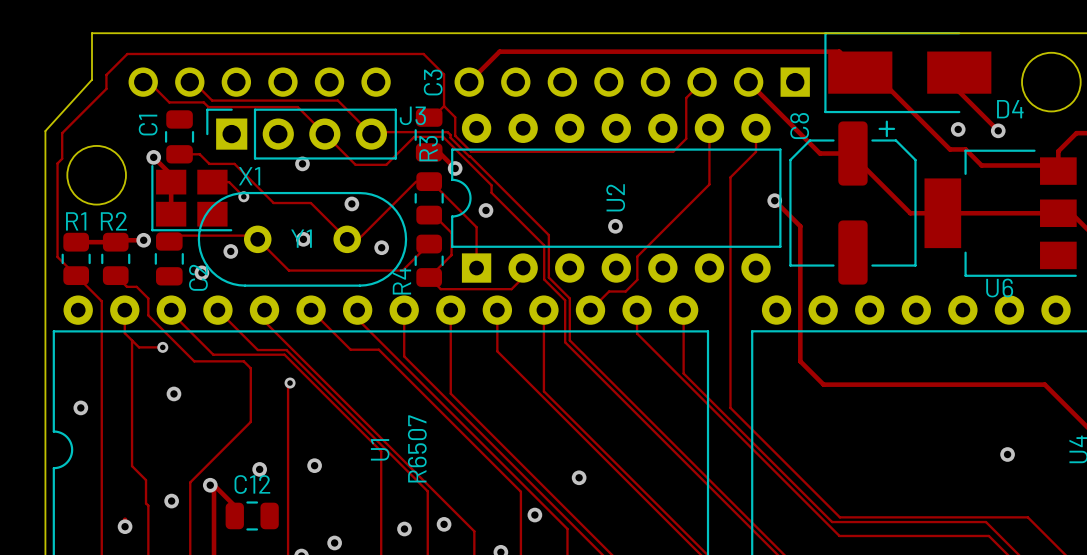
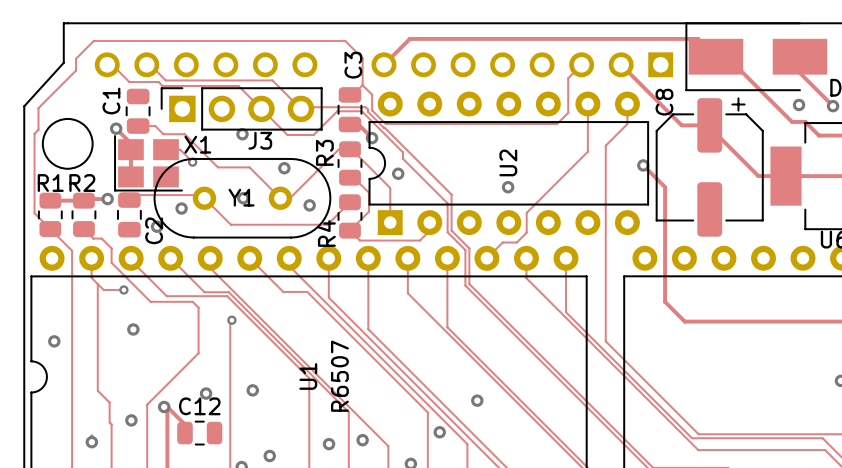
J3 name position: J3 (412, 115) -> J3 (260, 140)
R3 name position: R3 (428, 148) -> R3 (324, 152)

